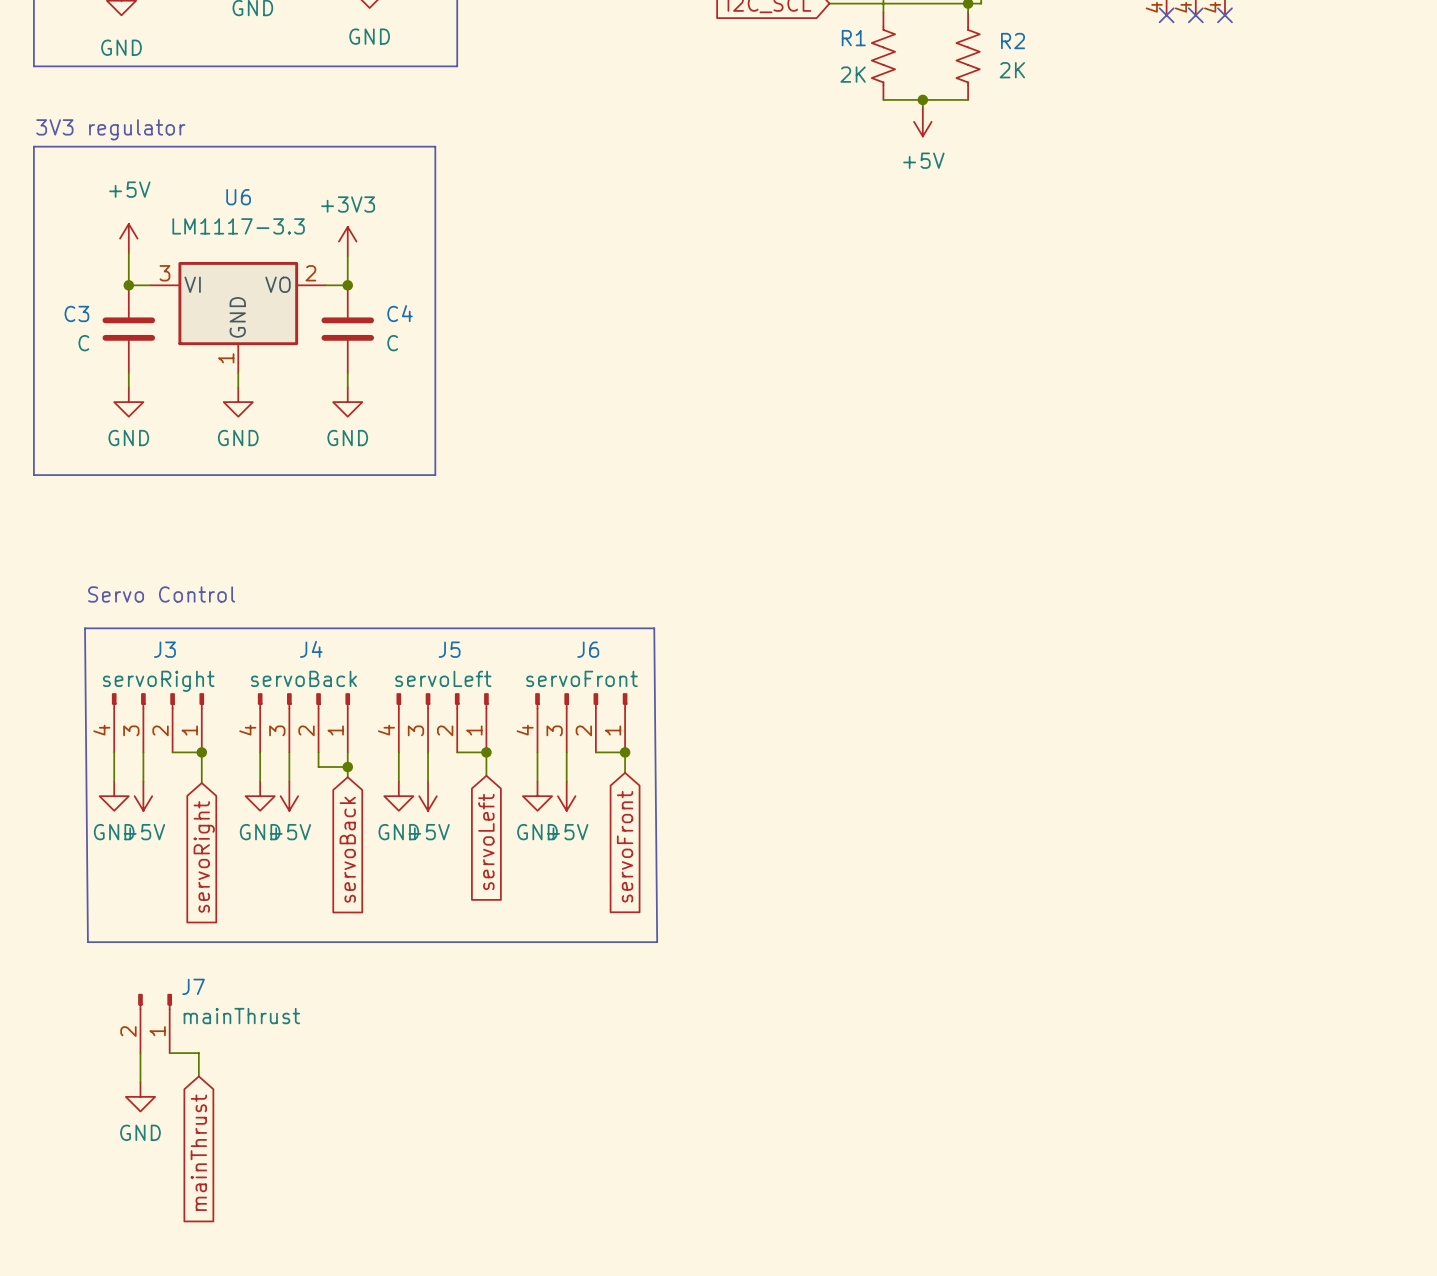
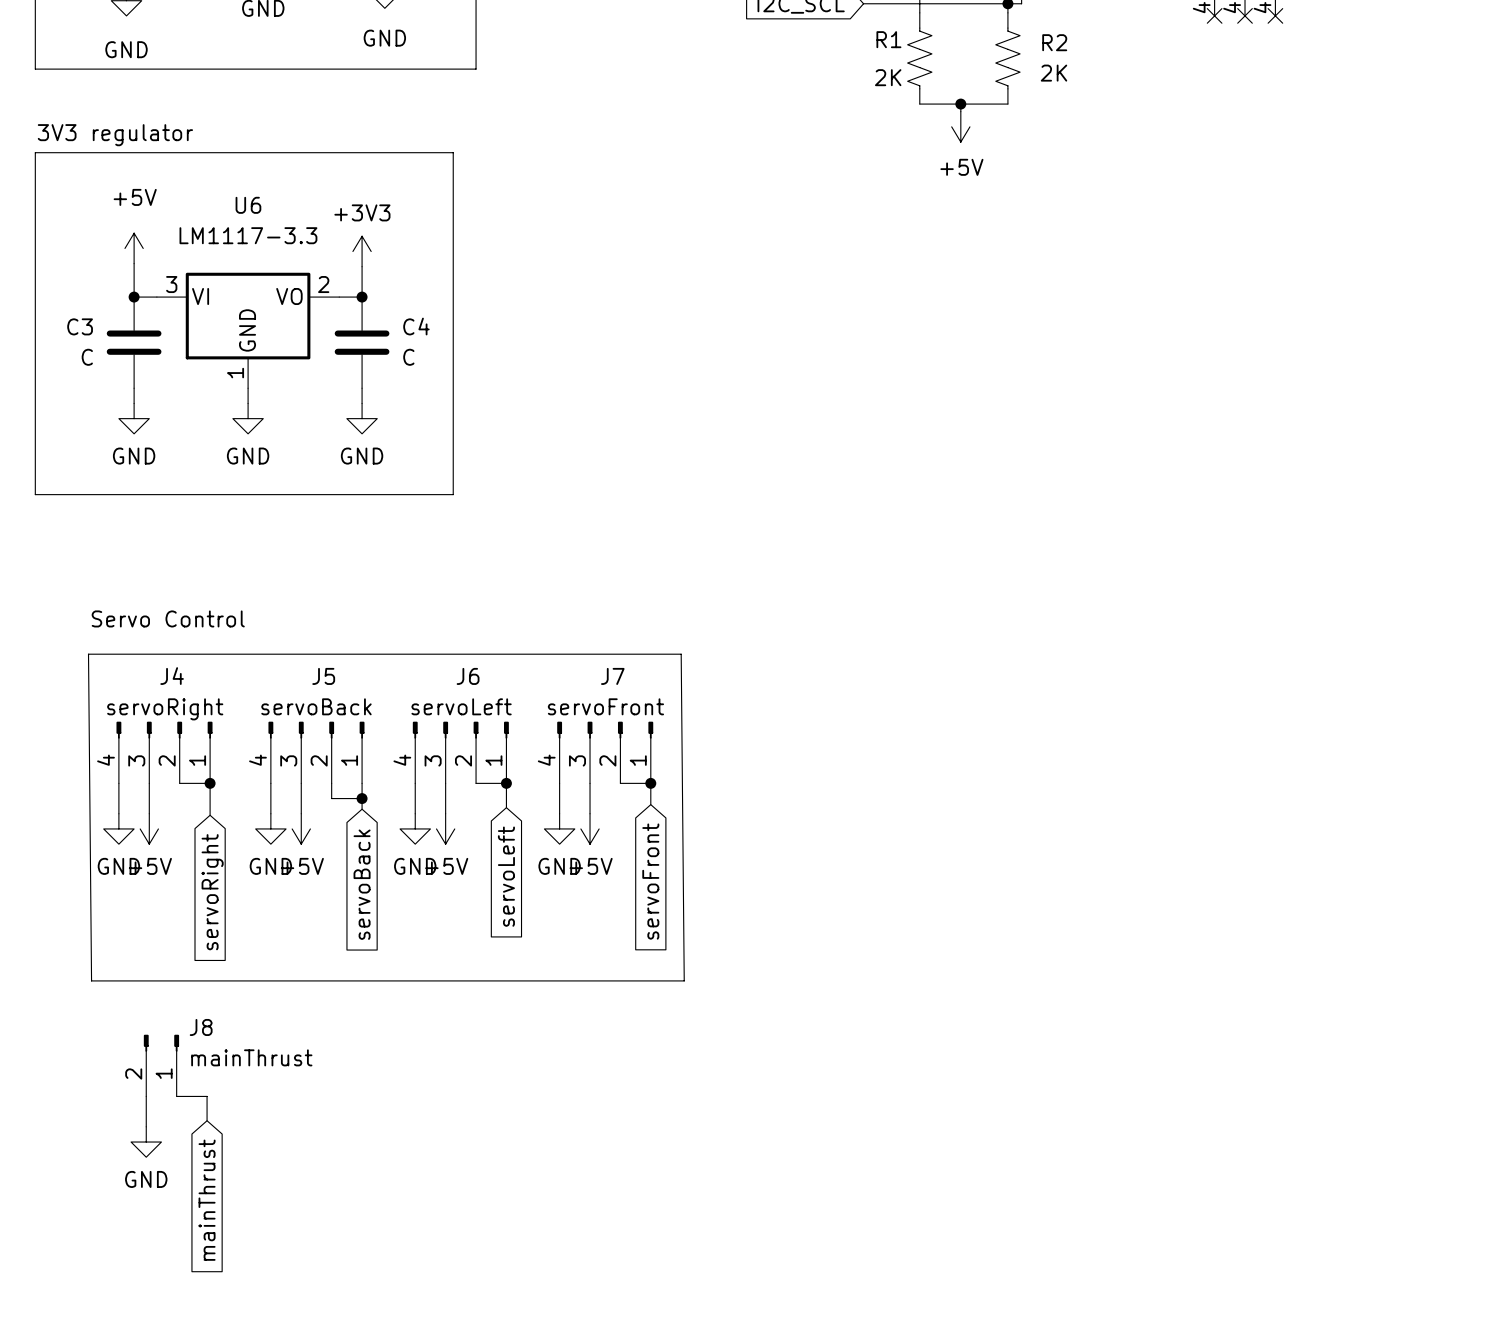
J3 name: J3 (164, 649) -> J4 (172, 676)
J4 name: J4 (311, 649) -> J5 (323, 676)
J5 name: J5 (449, 649) -> J6 (468, 676)
J6 name: J6 (588, 649) -> J7 (612, 676)
J7 name: J7 (193, 986) -> J8 (201, 1027)

